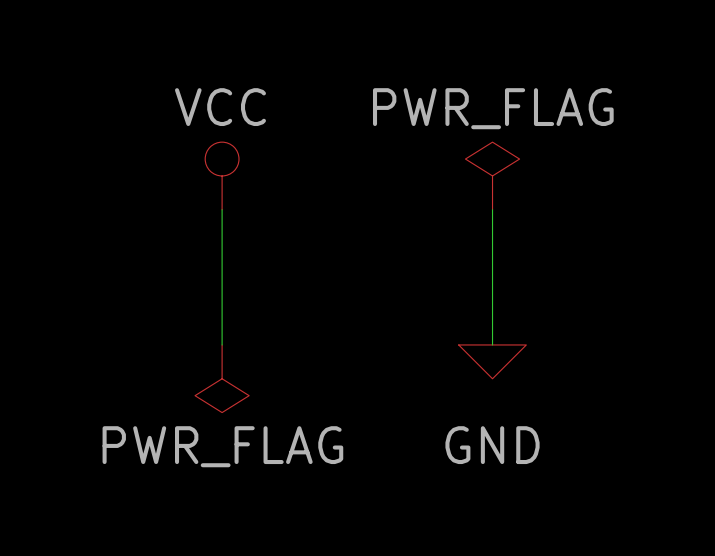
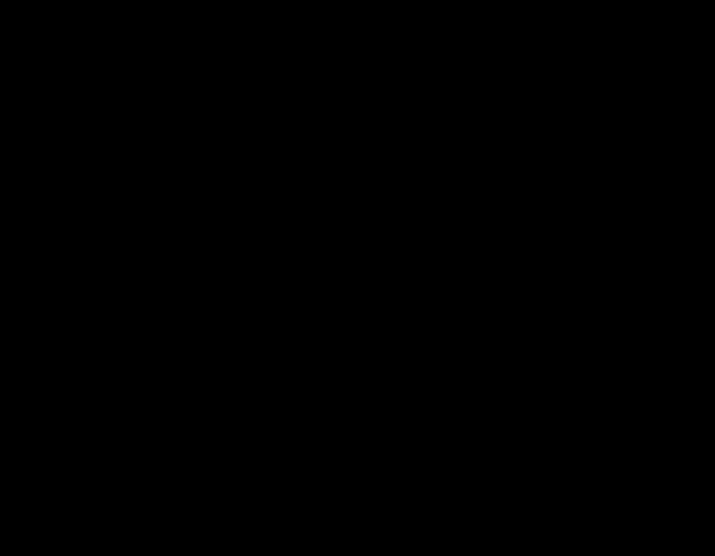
power symbol: VCC (222, 175) -> none
power symbol: PWR_FLAG (492, 175) -> none
wire: (222, 209) (222, 344) -> none
wire: (492, 209) (492, 344) -> none
power symbol: GND (492, 361) -> none
power symbol: PWR_FLAG (222, 378) -> none

